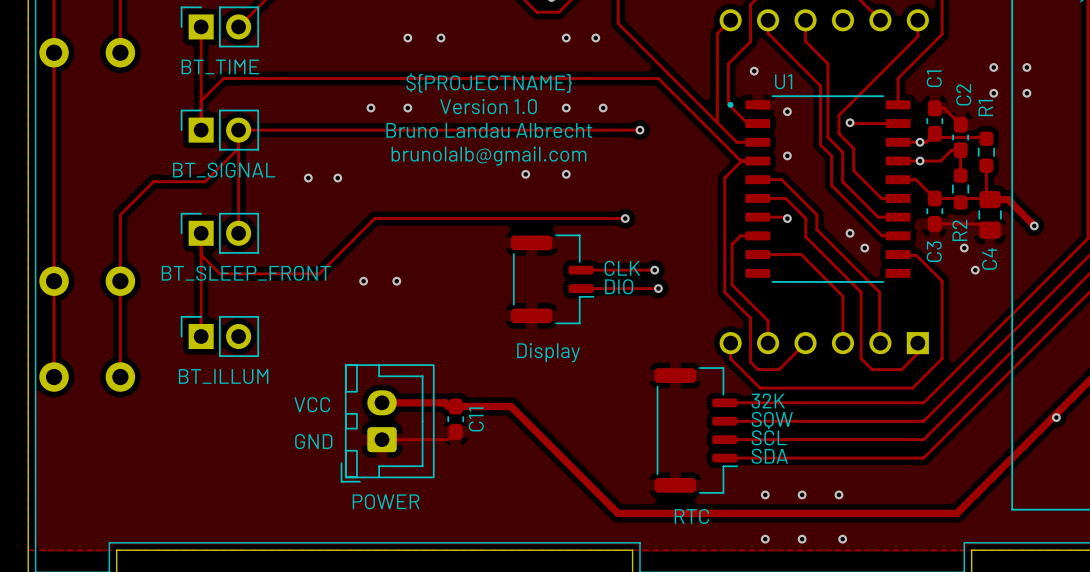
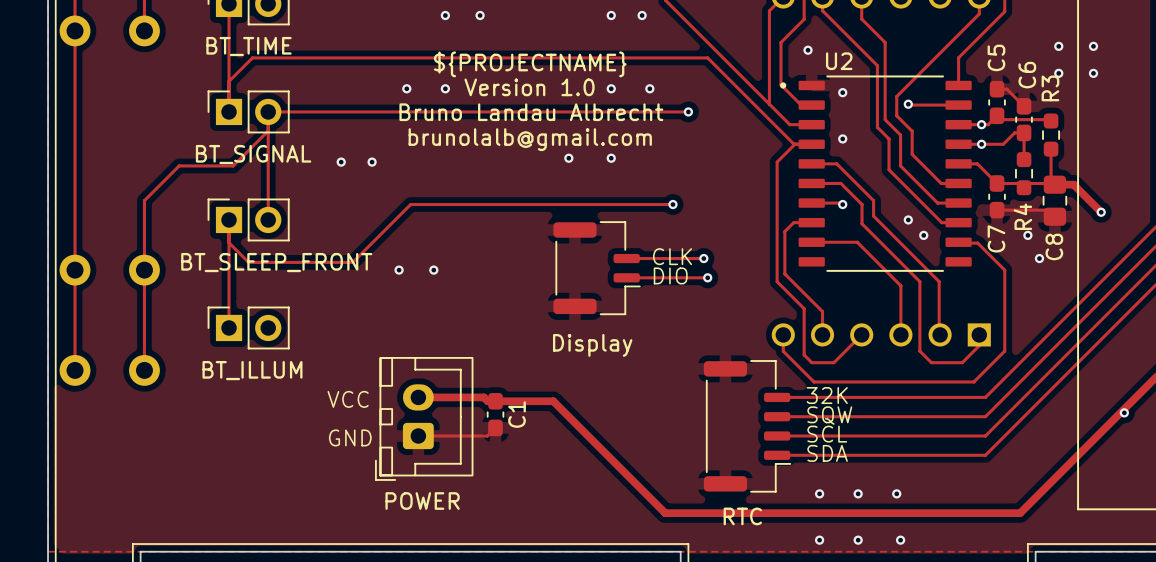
C1 name: C1 (934, 78) -> C5 (996, 57)
U1 name: U1 (783, 81) -> U2 (839, 61)
C2 name: C2 (963, 94) -> C6 (1027, 75)
R1 name: R1 (985, 107) -> R3 (1050, 88)
R2 name: R2 (959, 230) -> R4 (1022, 216)
C3 name: C3 (934, 251) -> C7 (996, 238)
C4 name: C4 (989, 258) -> C8 (1054, 246)
C11 name: C11 (476, 419) -> C1 (517, 414)

